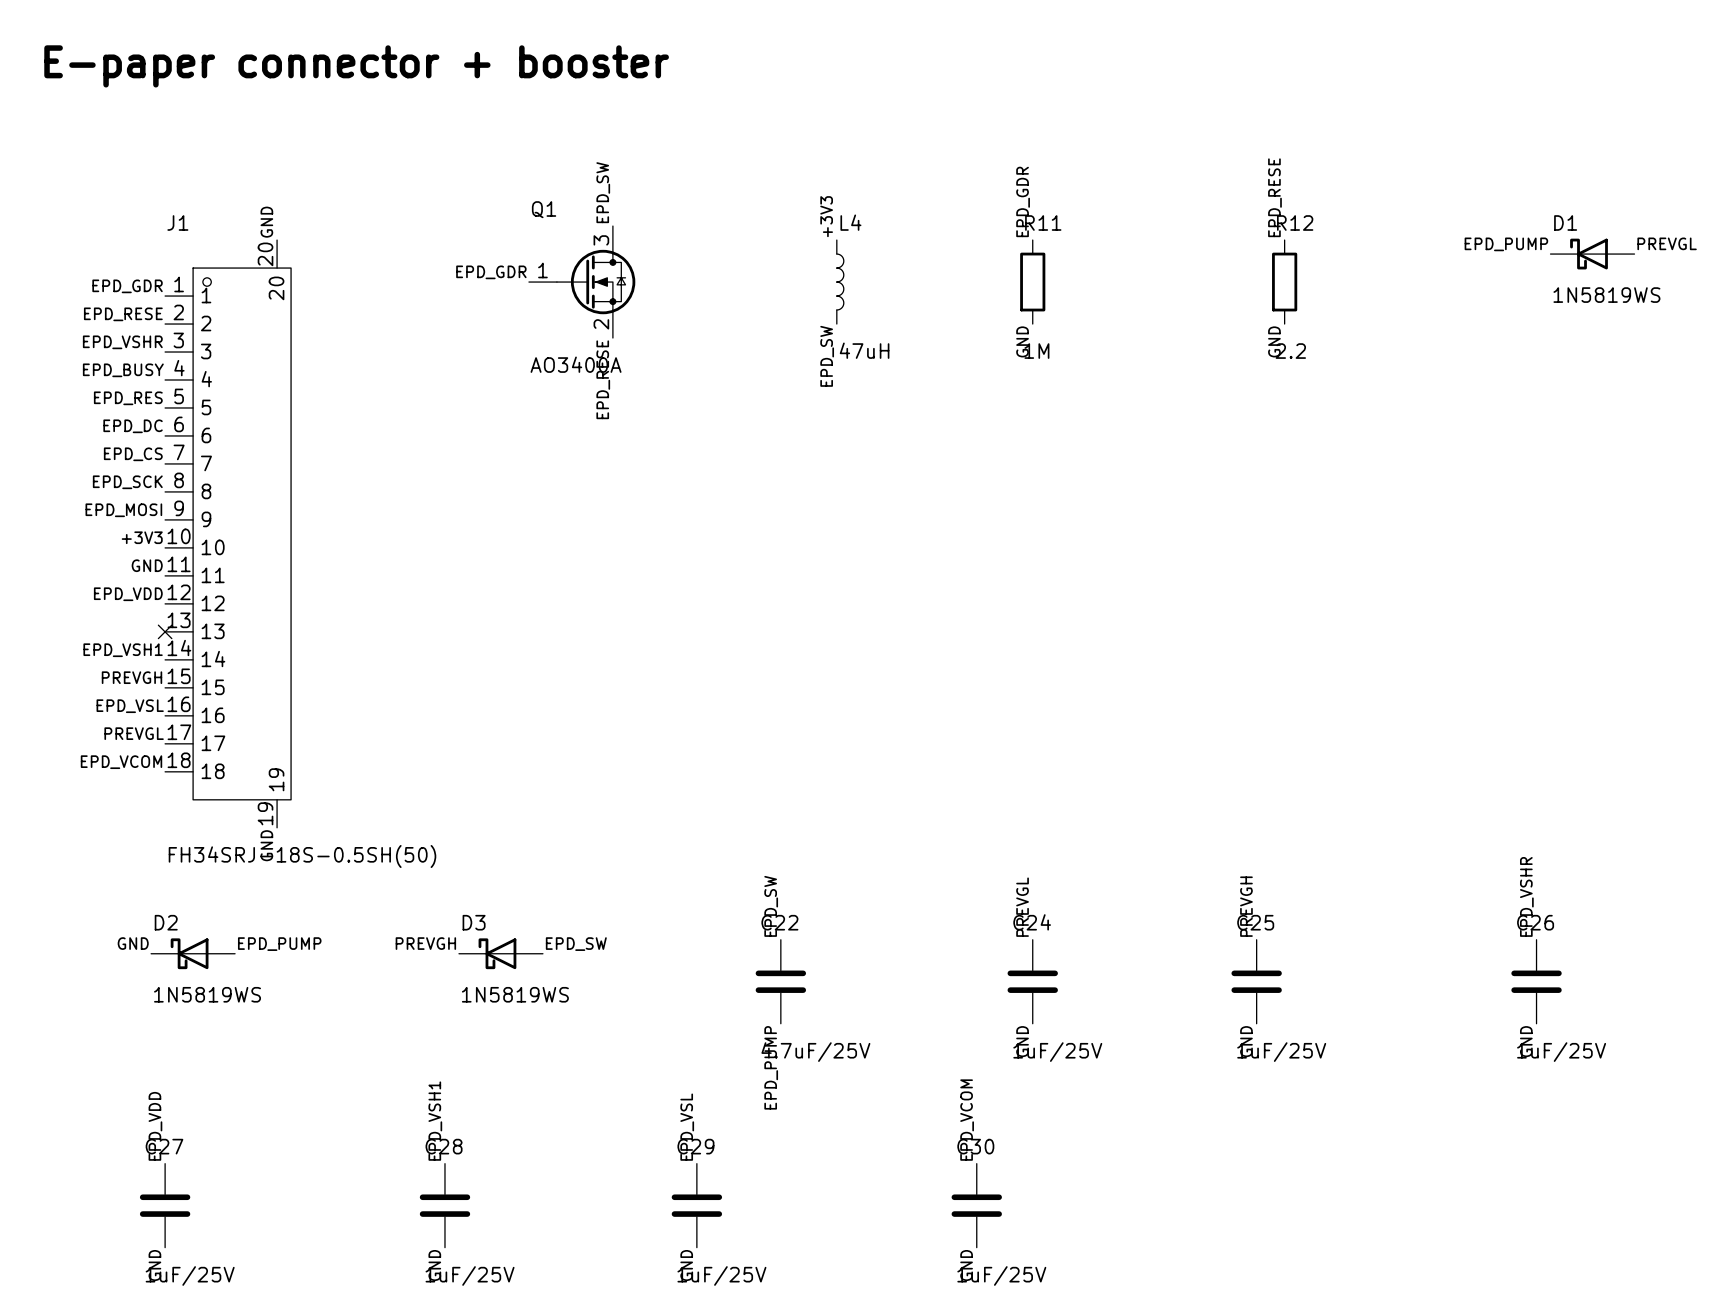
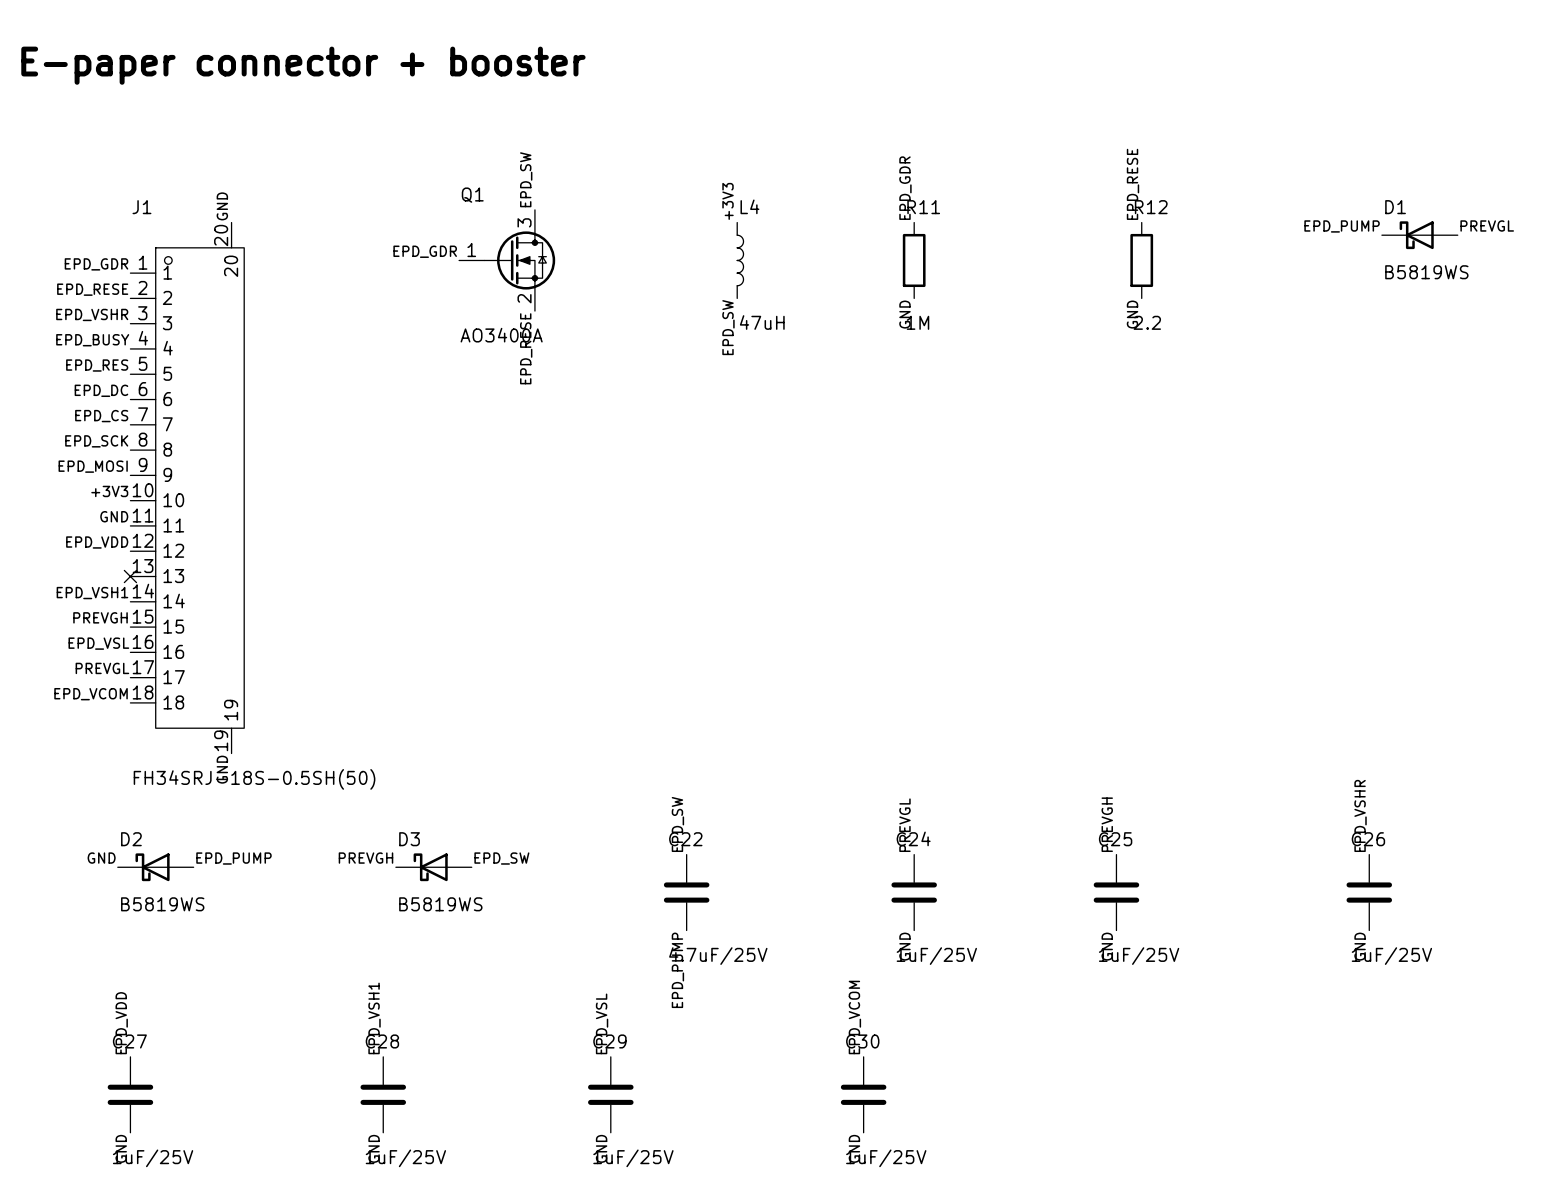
D1 value: 1N5819WS (1606, 295) -> B5819WS (1426, 272)
D2 value: 1N5819WS (207, 994) -> B5819WS (162, 904)
D3 value: 1N5819WS (515, 994) -> B5819WS (440, 904)

